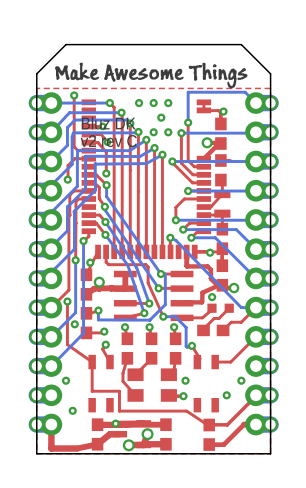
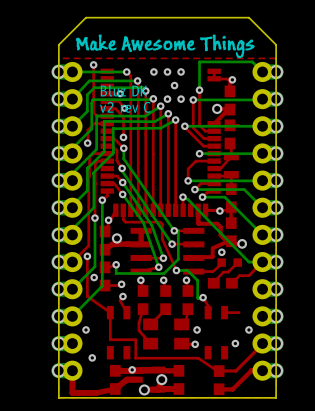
top track: (255, 336) (230, 362) -> none

